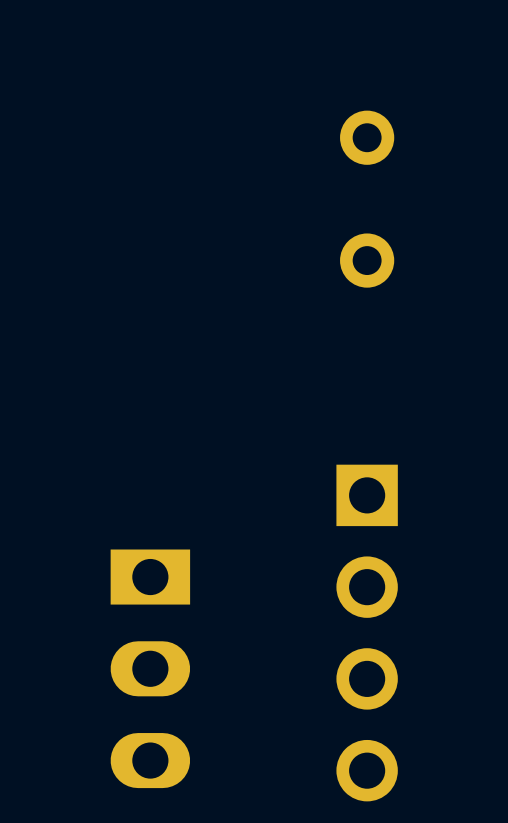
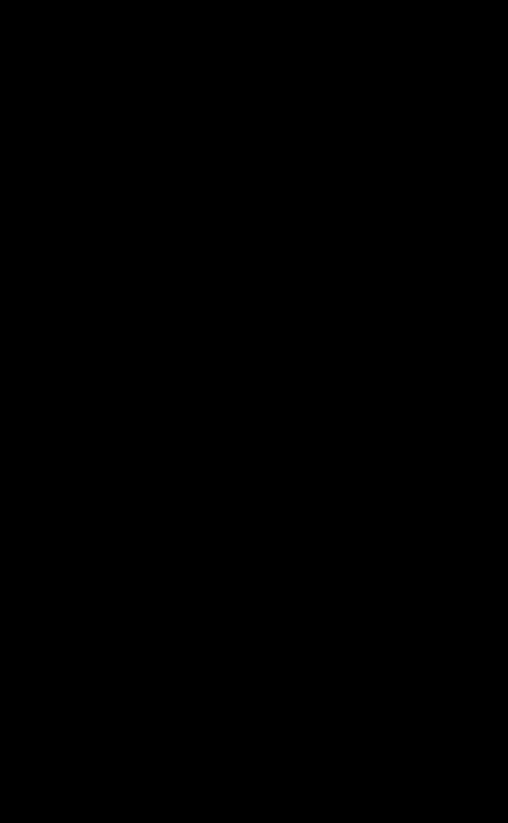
part: (367, 199) -> none
part: (367, 633) -> none
part: (150, 668) -> none

